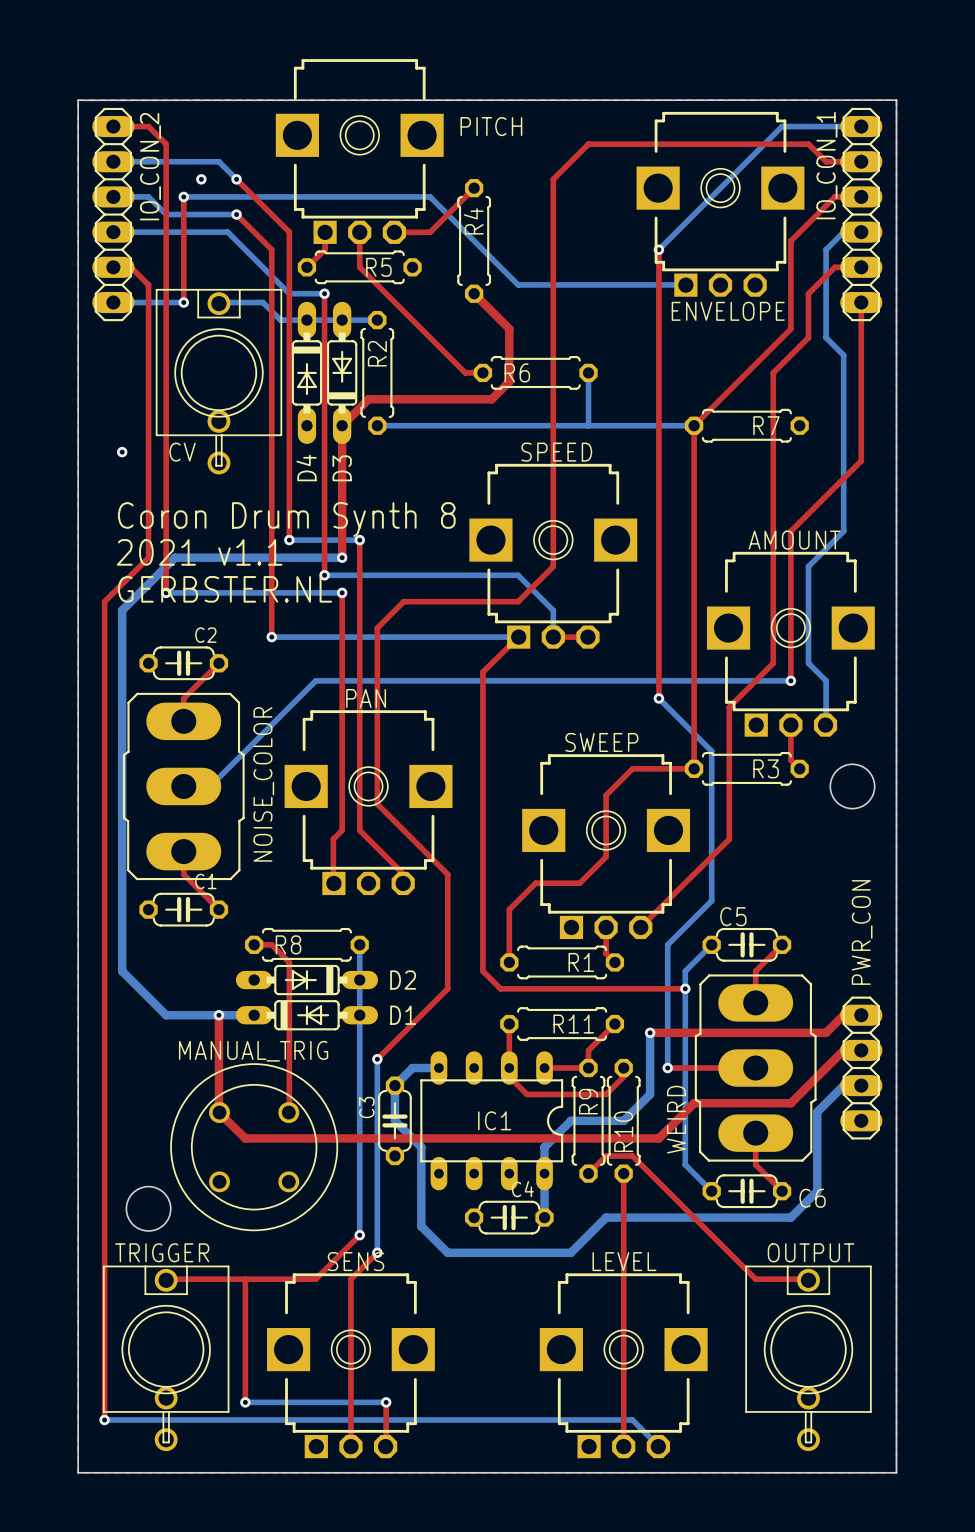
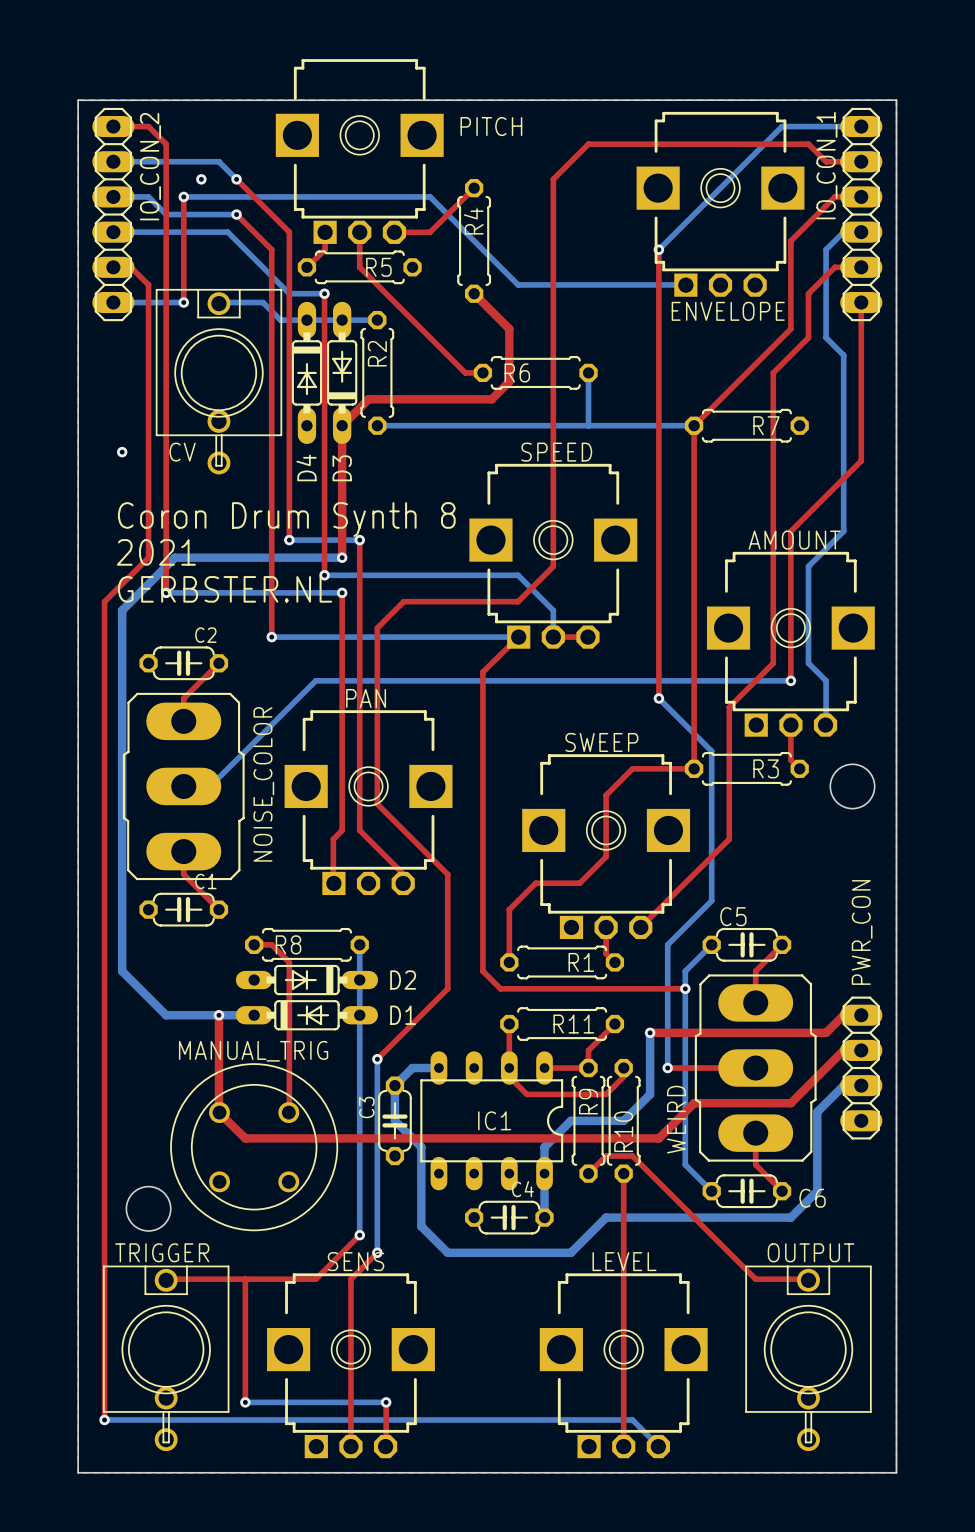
text: 2021 v1.1 (199, 552) -> 2021 (156, 552)

